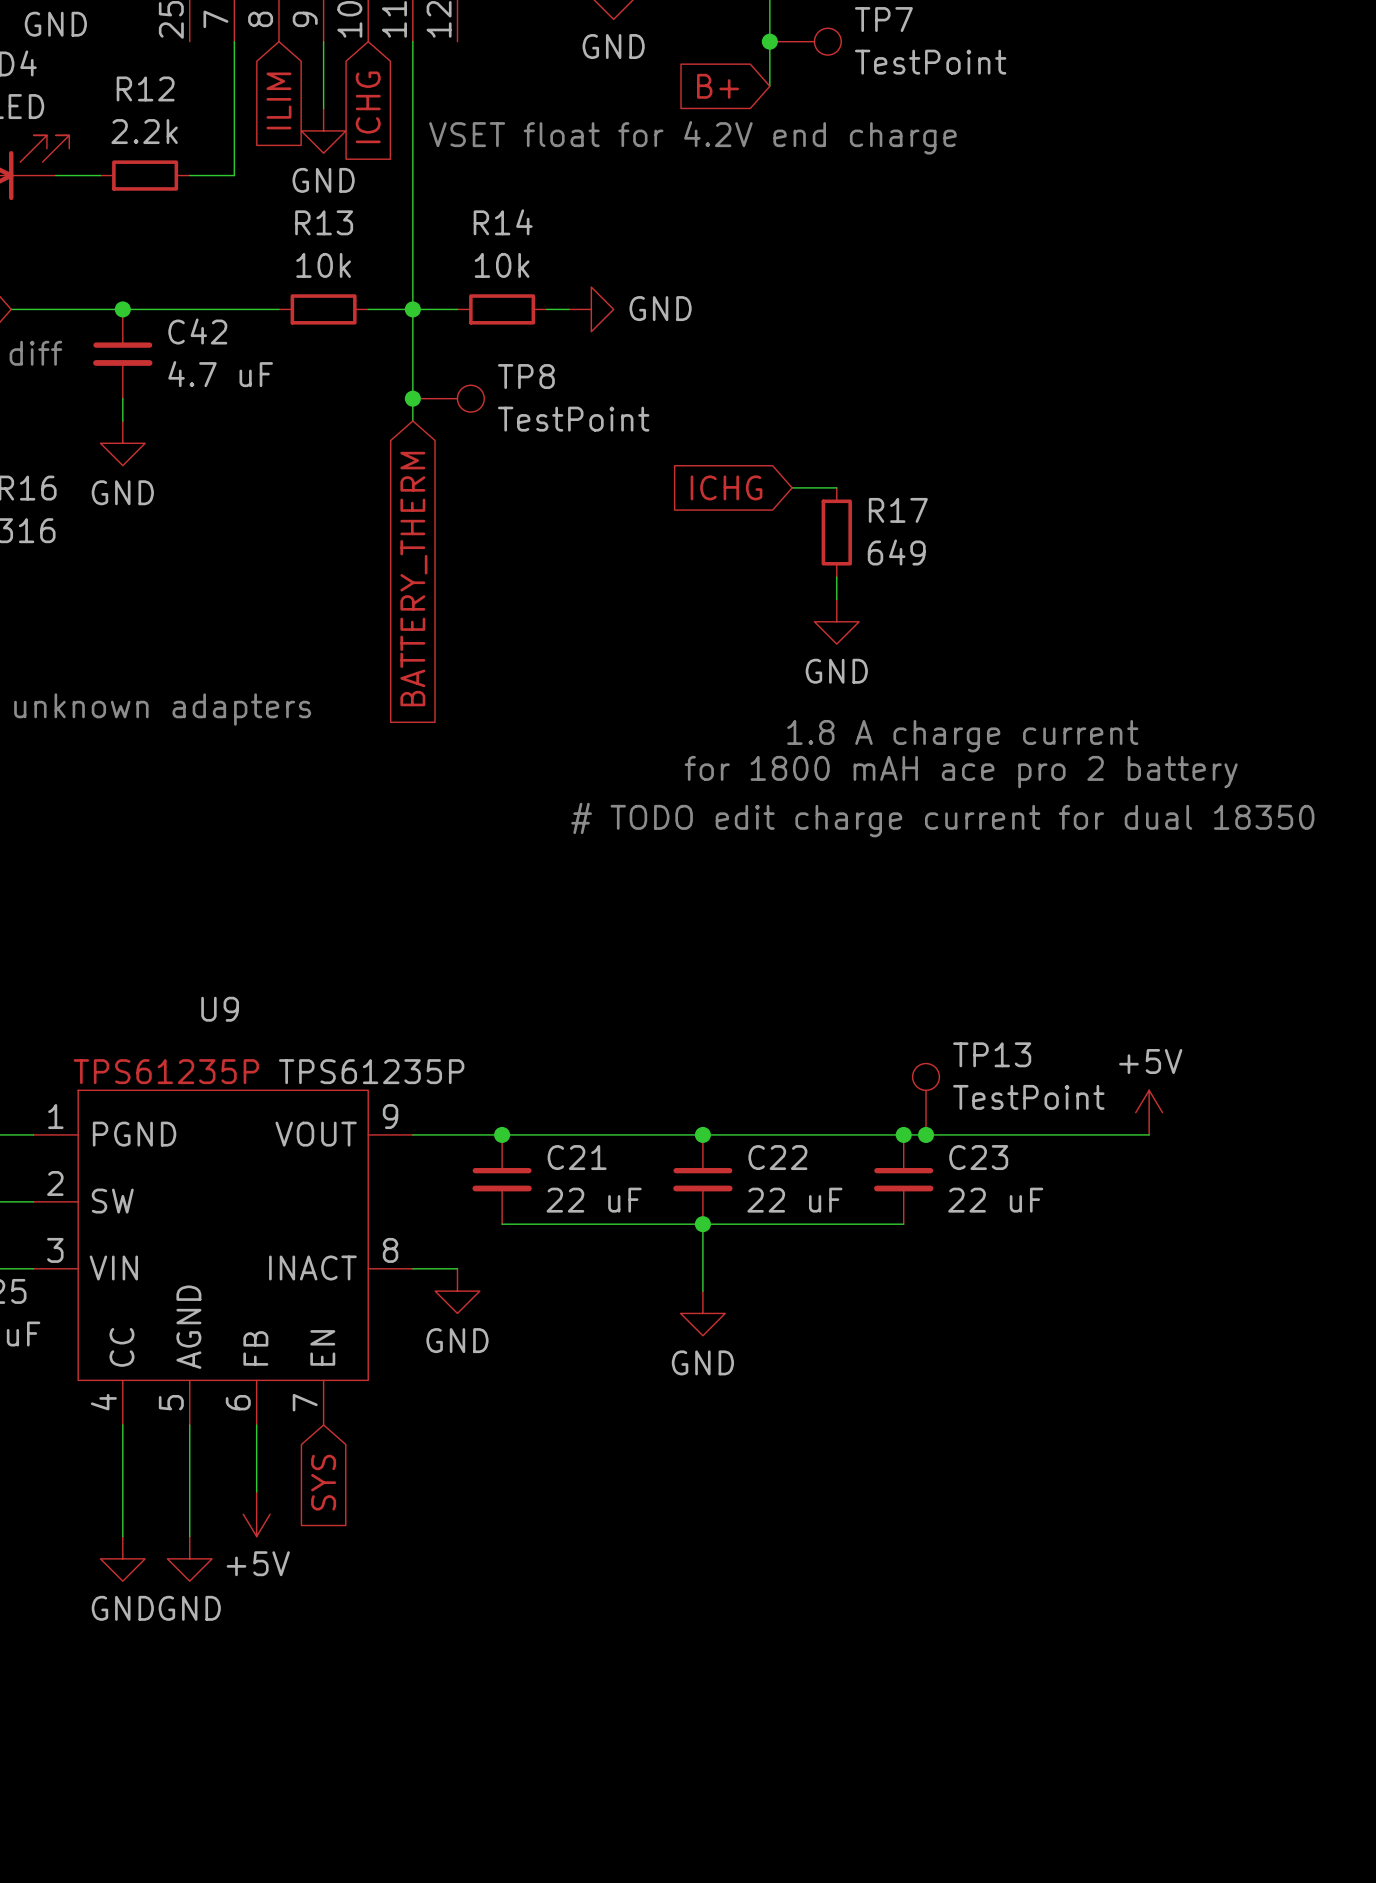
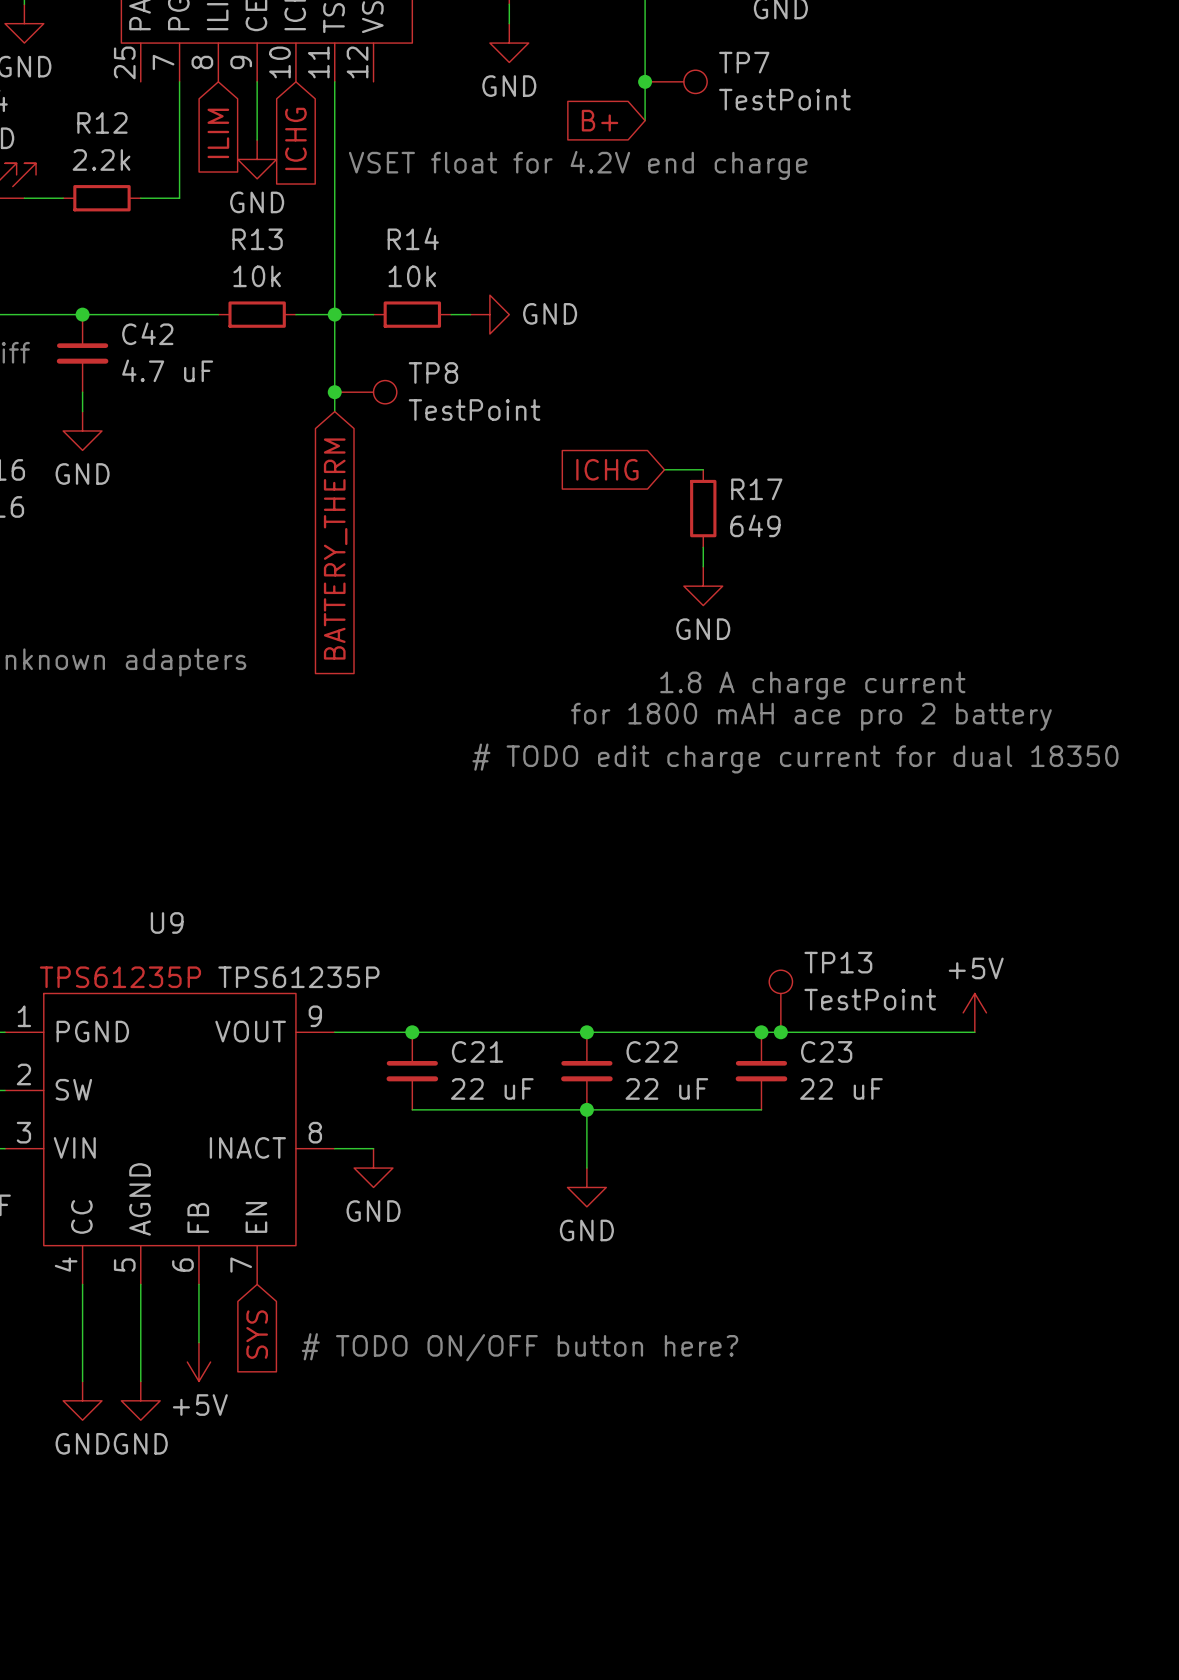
text: none -> # TODO ON/OFF button here? (520, 1347)

